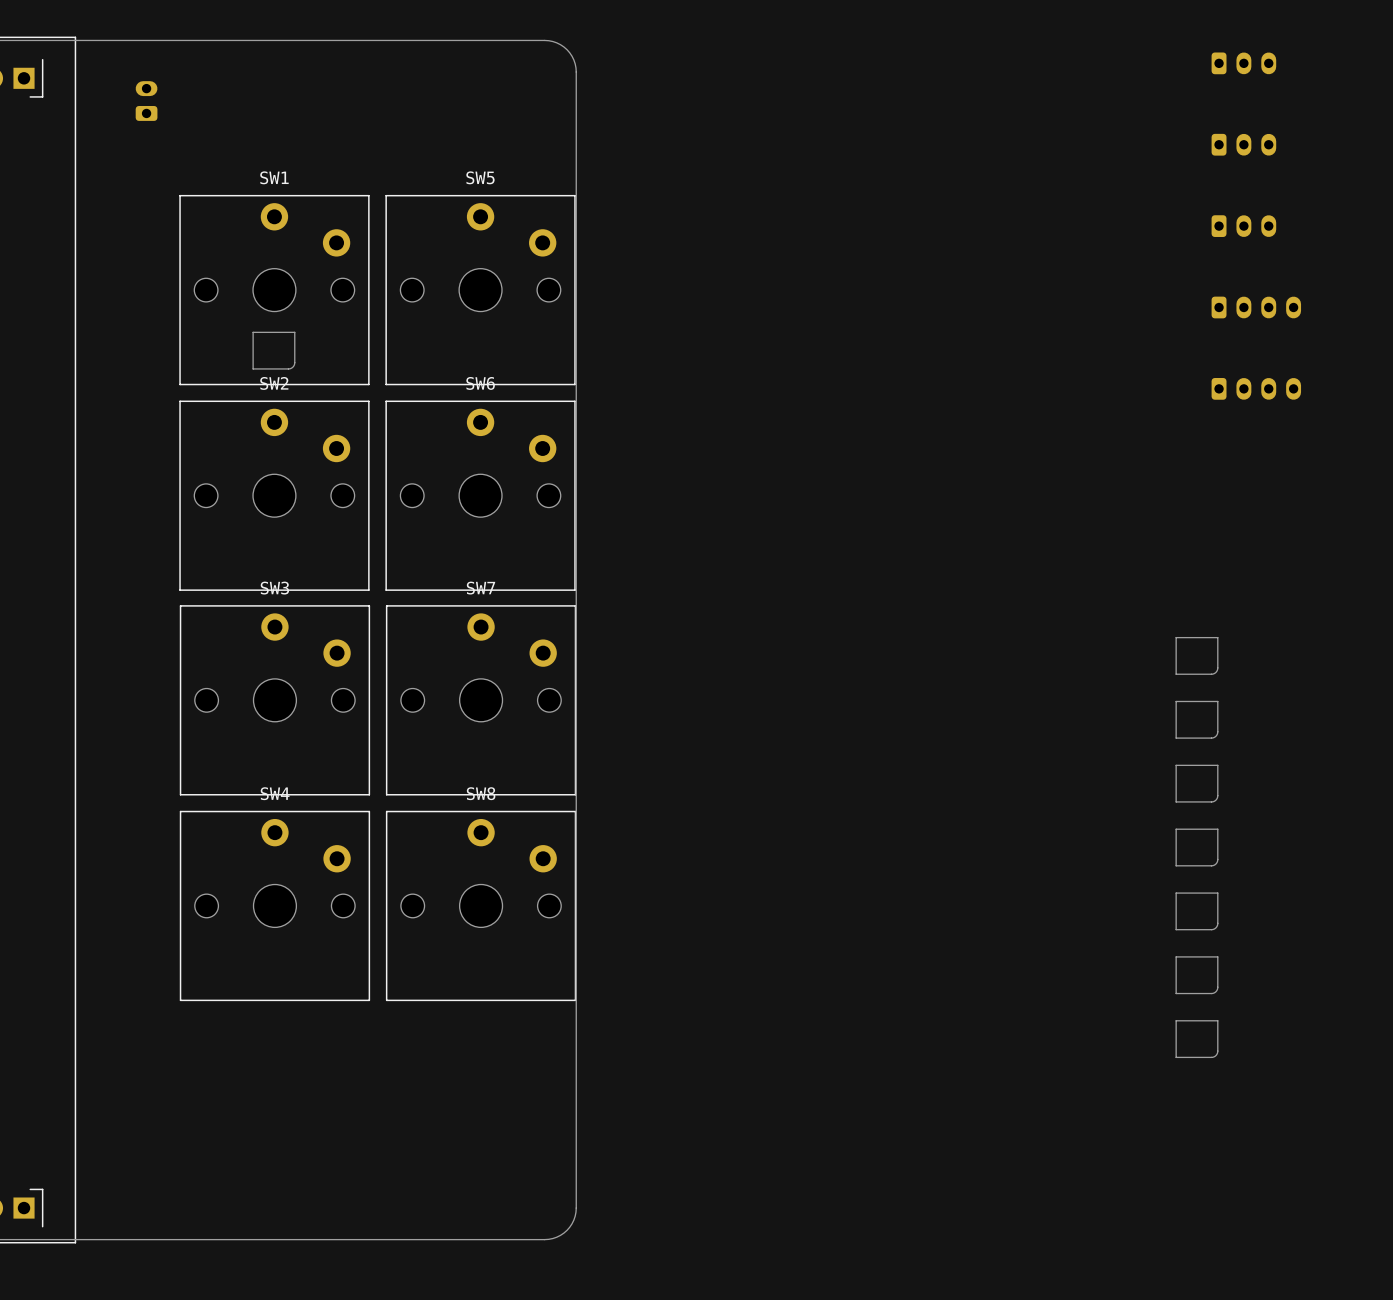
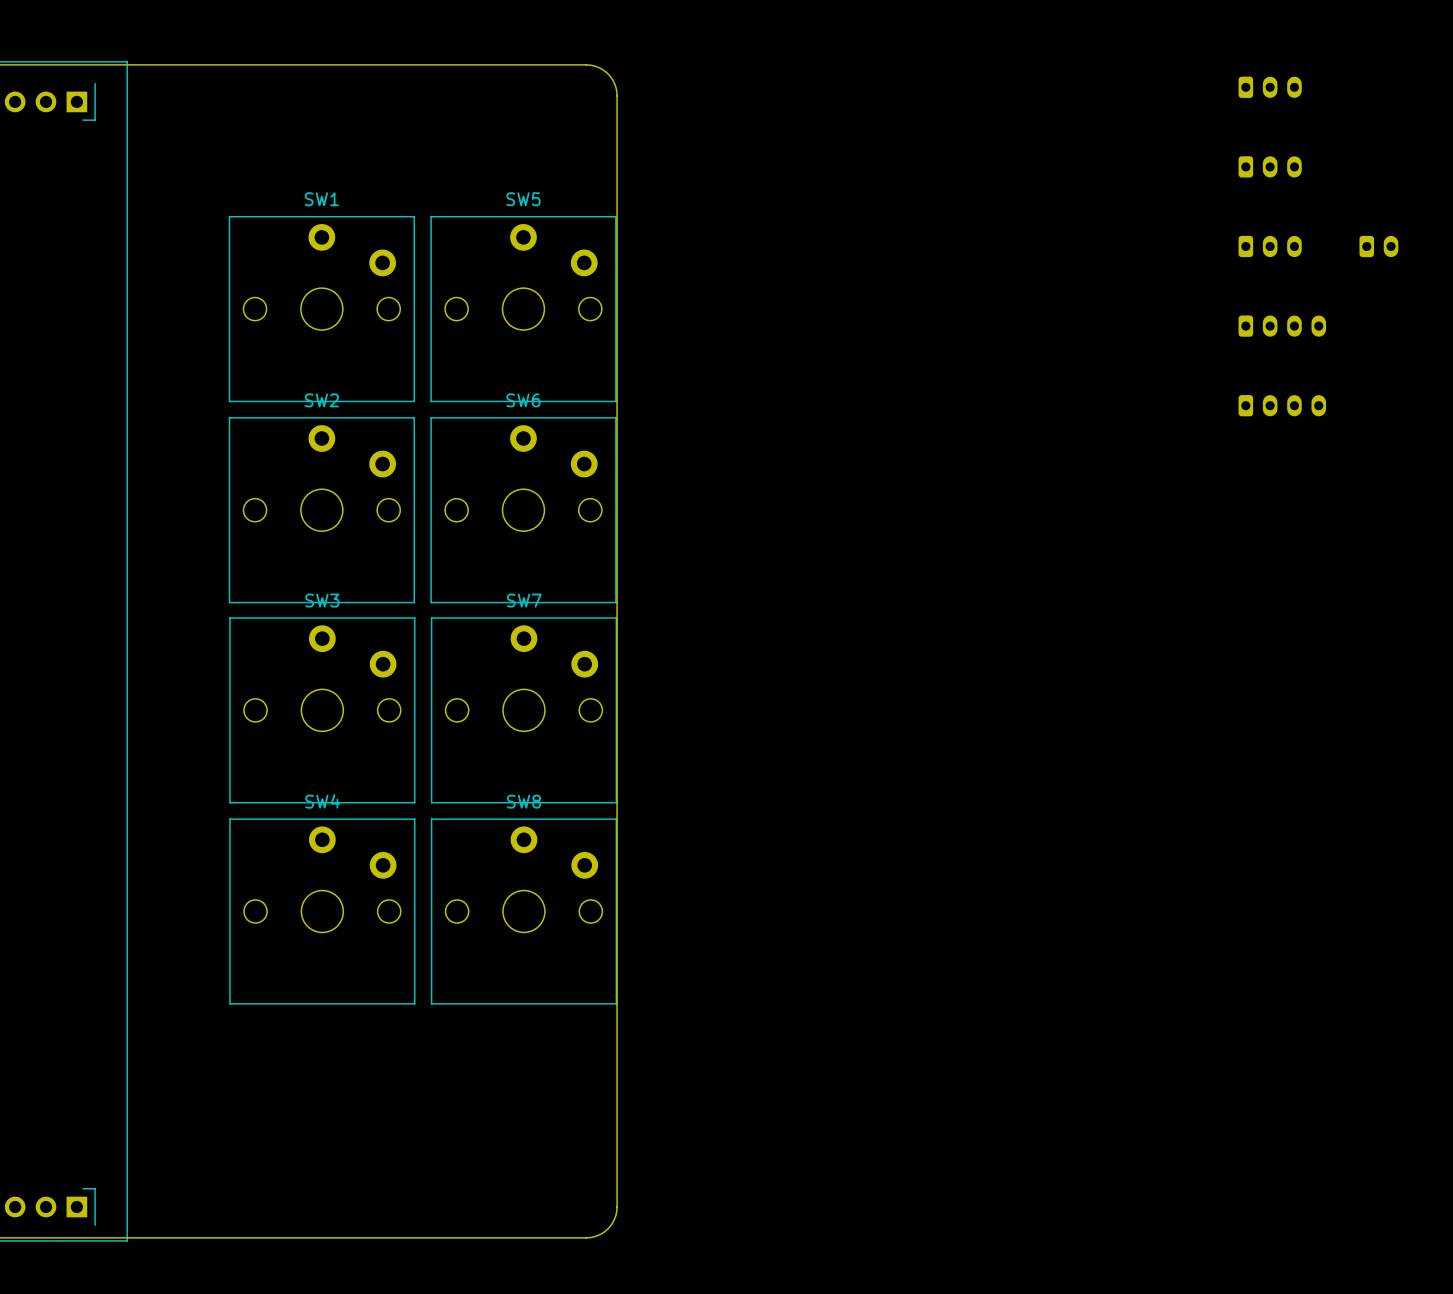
part: (146, 101) -> none
part: none -> (1378, 246)
part: (273, 350) -> none
part: (1196, 655) -> none
part: (1196, 719) -> none
part: (1196, 783) -> none
part: (1196, 847) -> none
part: (1196, 911) -> none
part: (1196, 975) -> none
part: (1196, 1039) -> none

